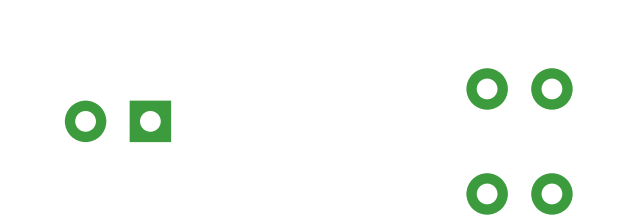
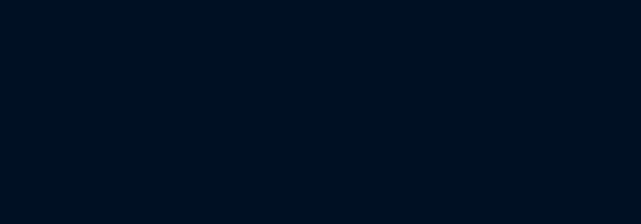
part: (519, 88) -> none
part: (117, 121) -> none
part: (519, 193) -> none

